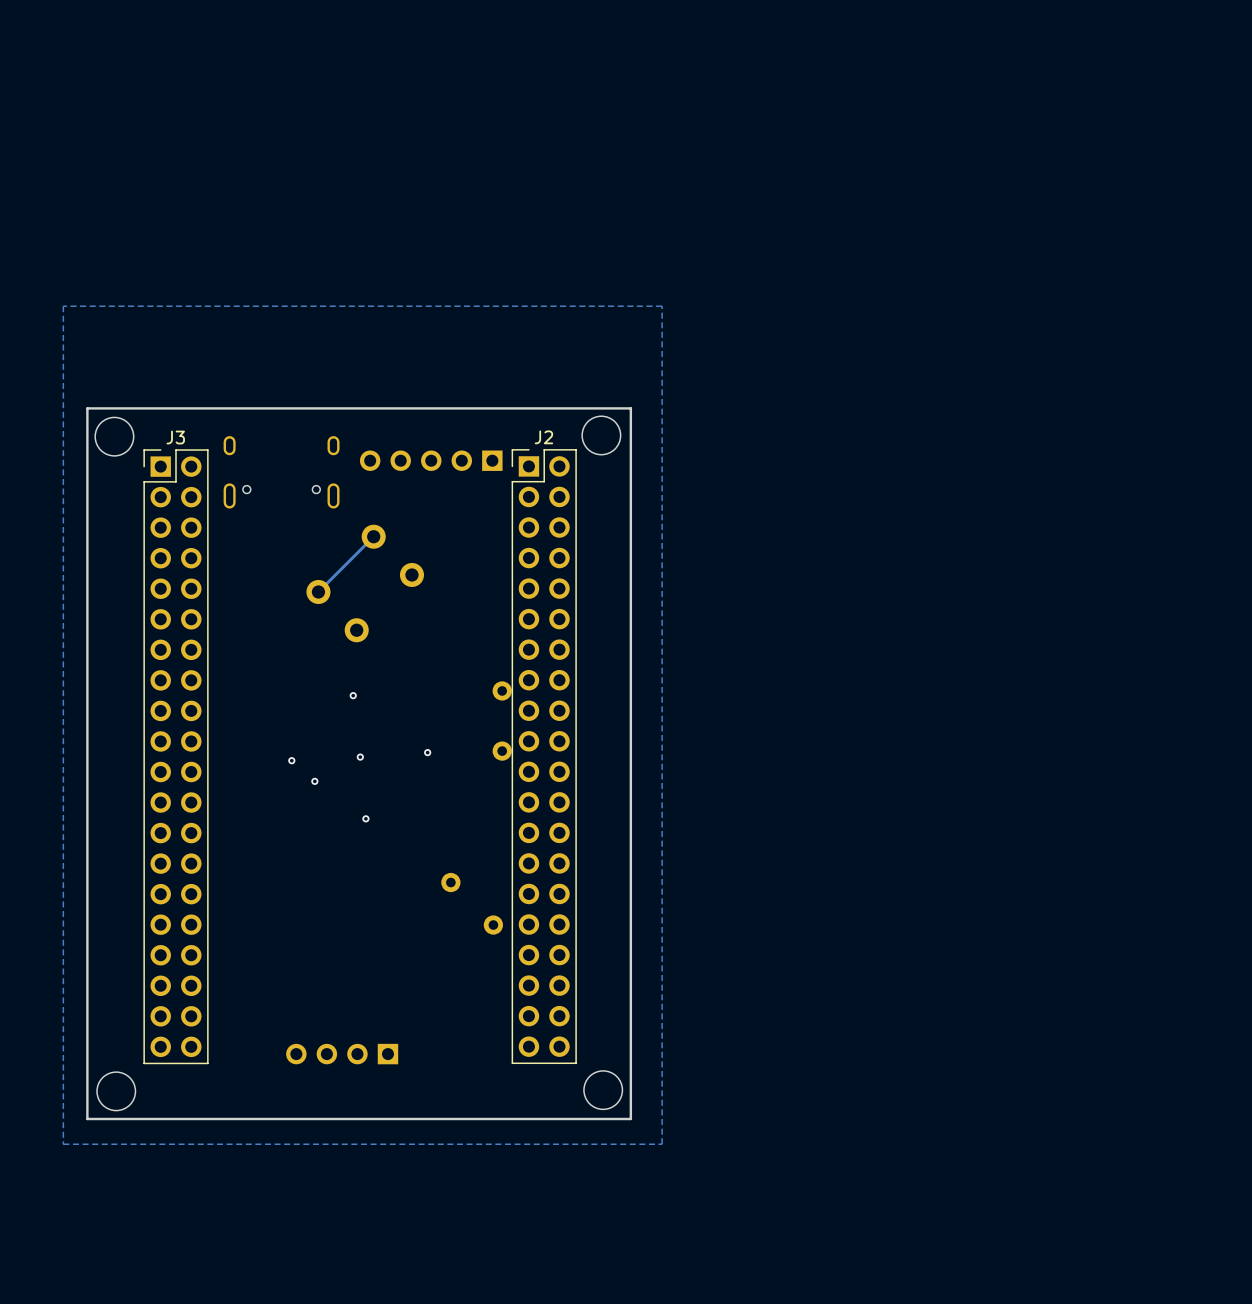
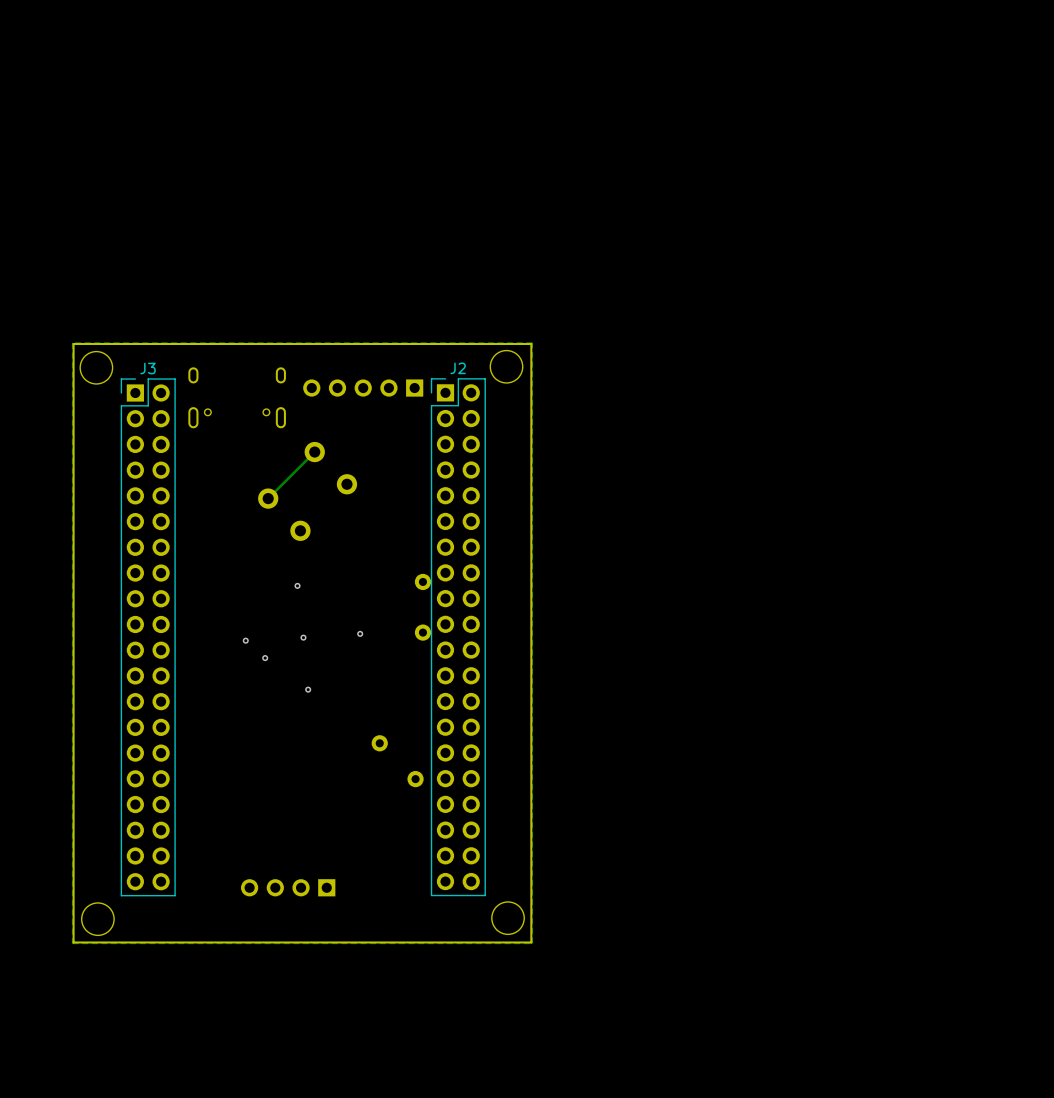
zone outline: (662, 306) (63, 306) (63, 1144) (662, 1144) (662, 306) -> (532, 342) (532, 943) (72, 943) (72, 342) (532, 342)

